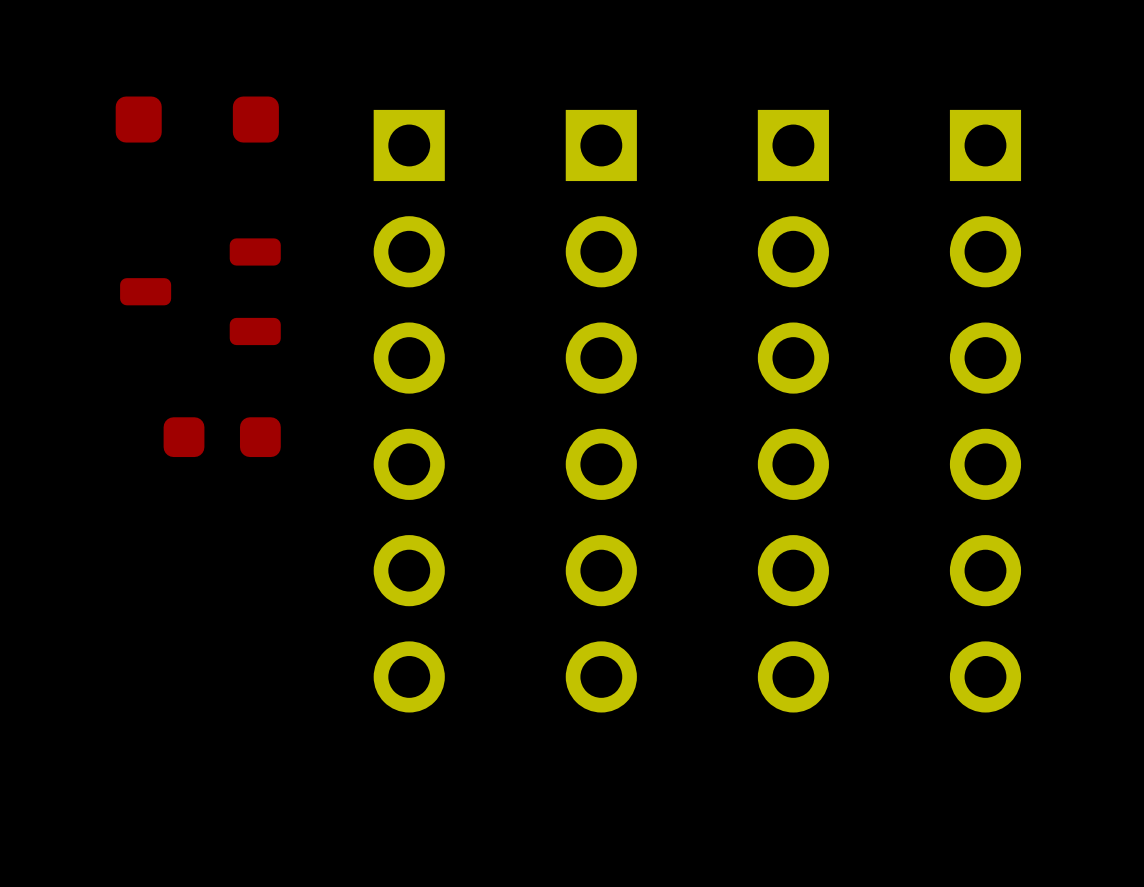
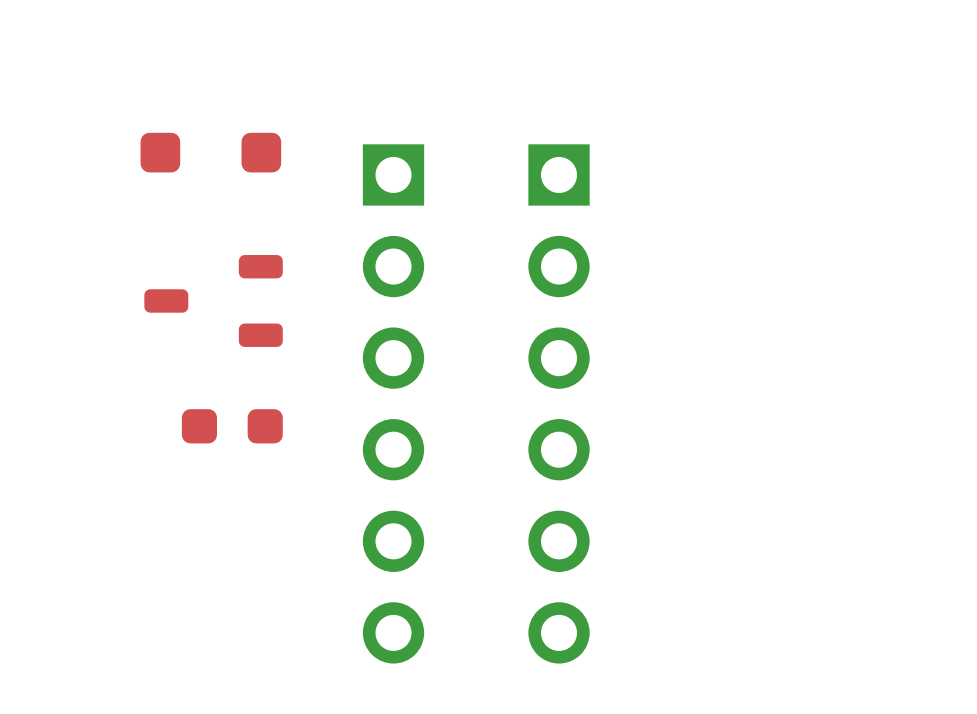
part: (793, 411) -> none
part: (985, 411) -> none

